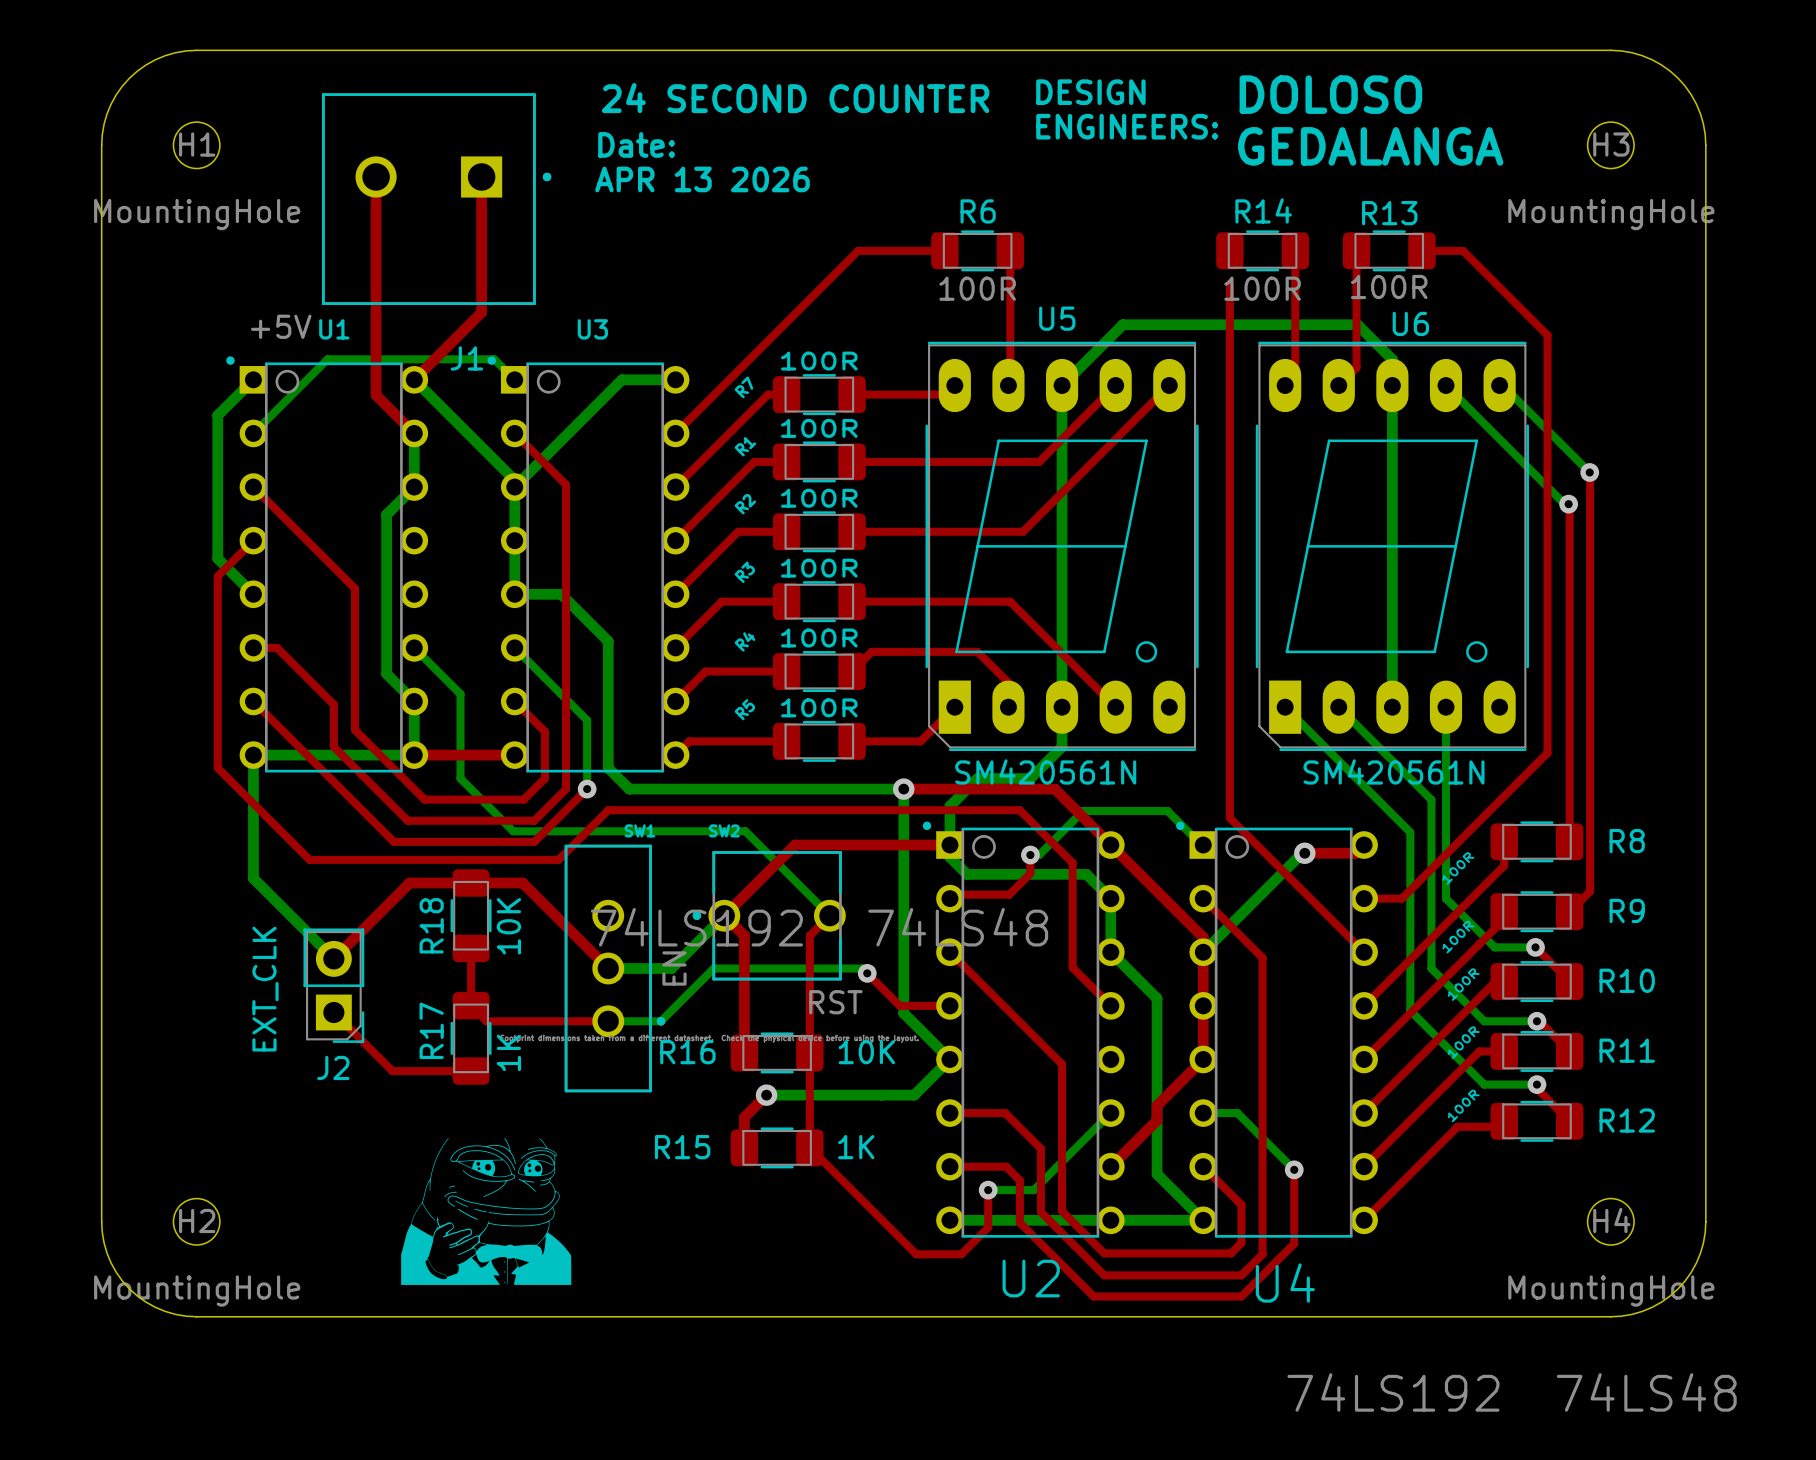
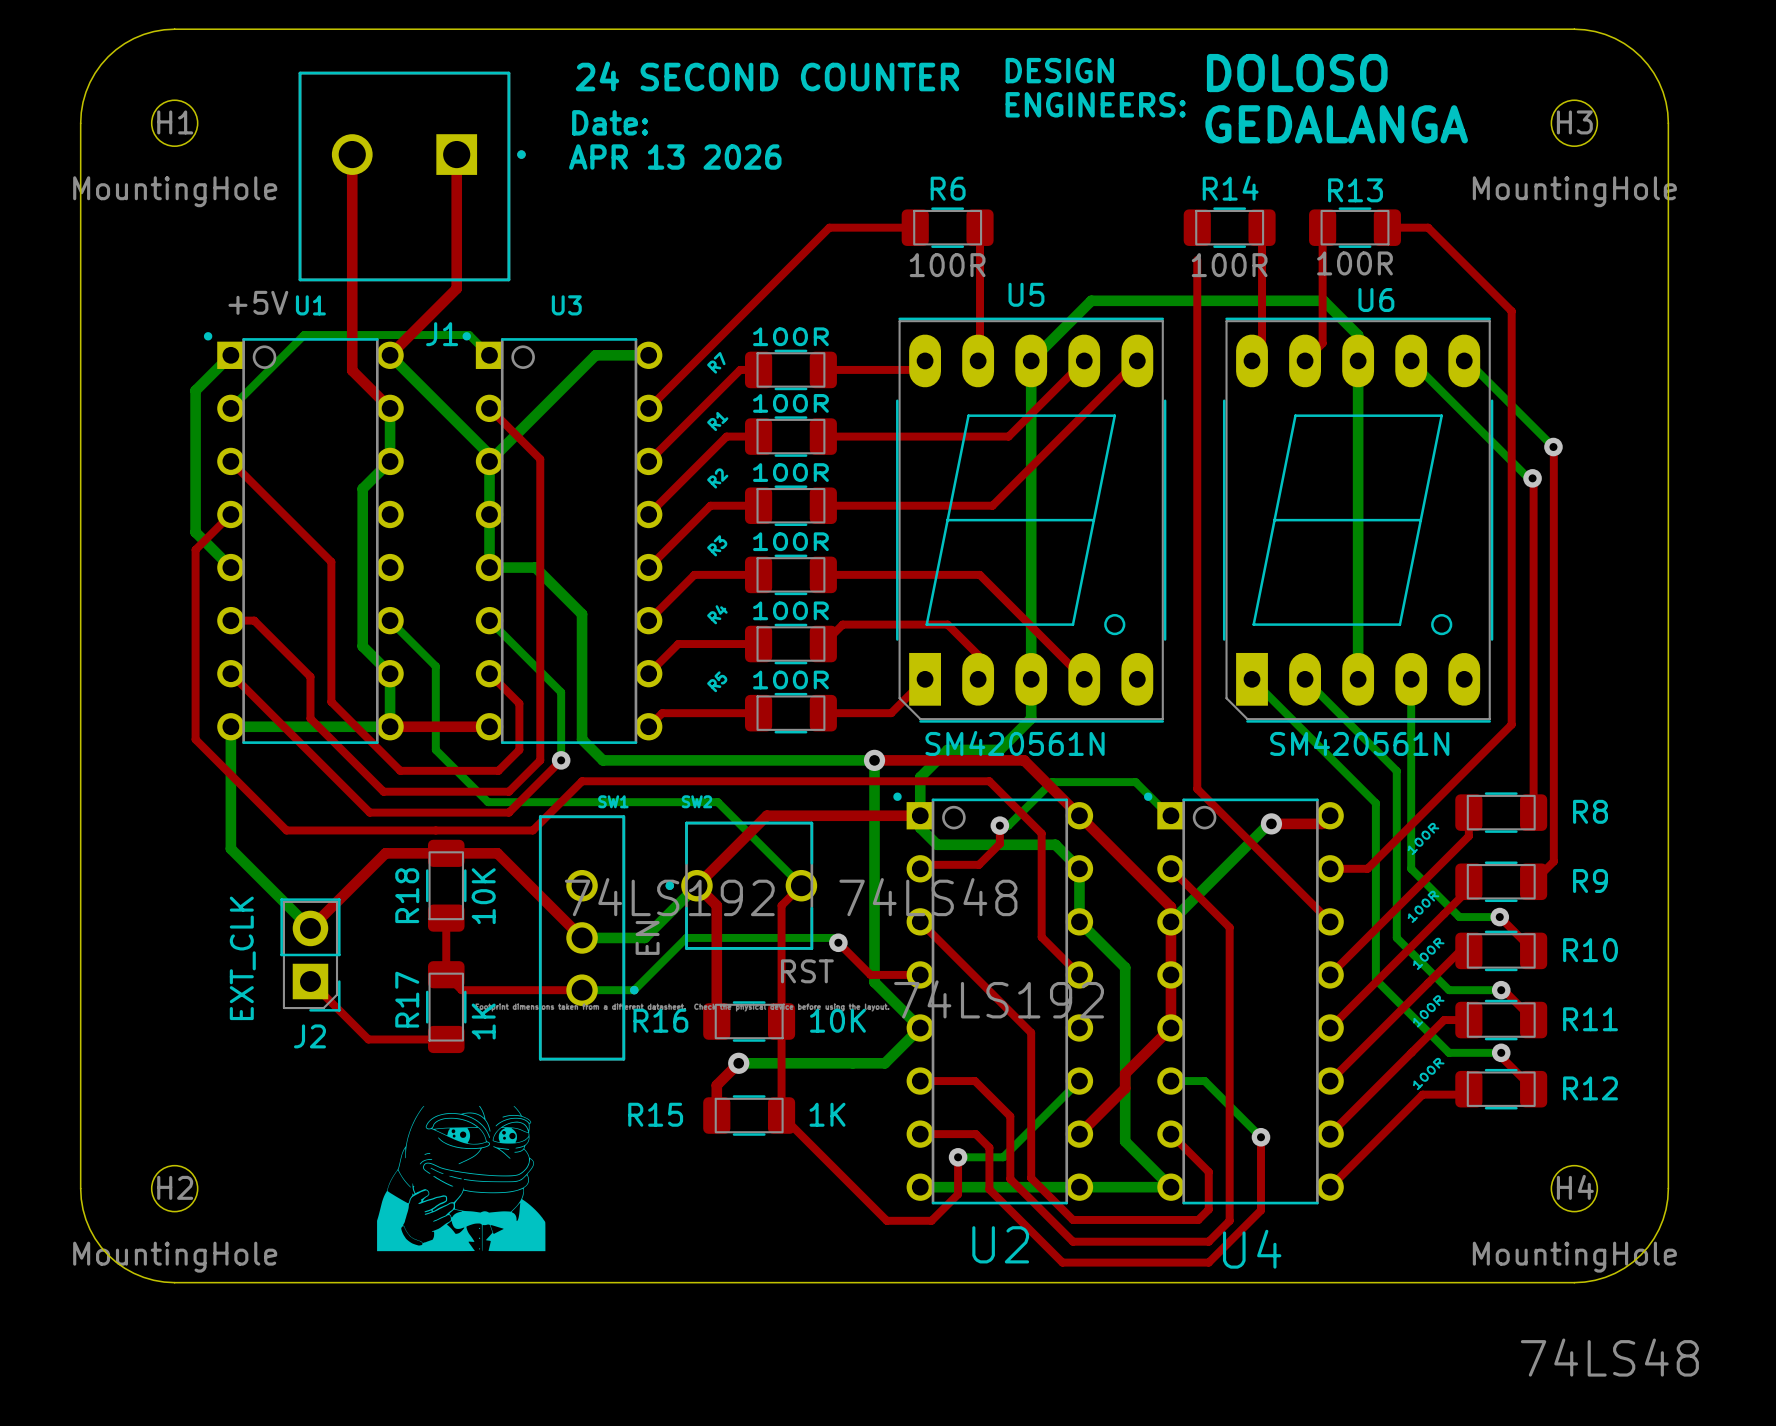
U2 value position: 74LS192 (1393, 1392) -> 74LS192 (999, 999)

